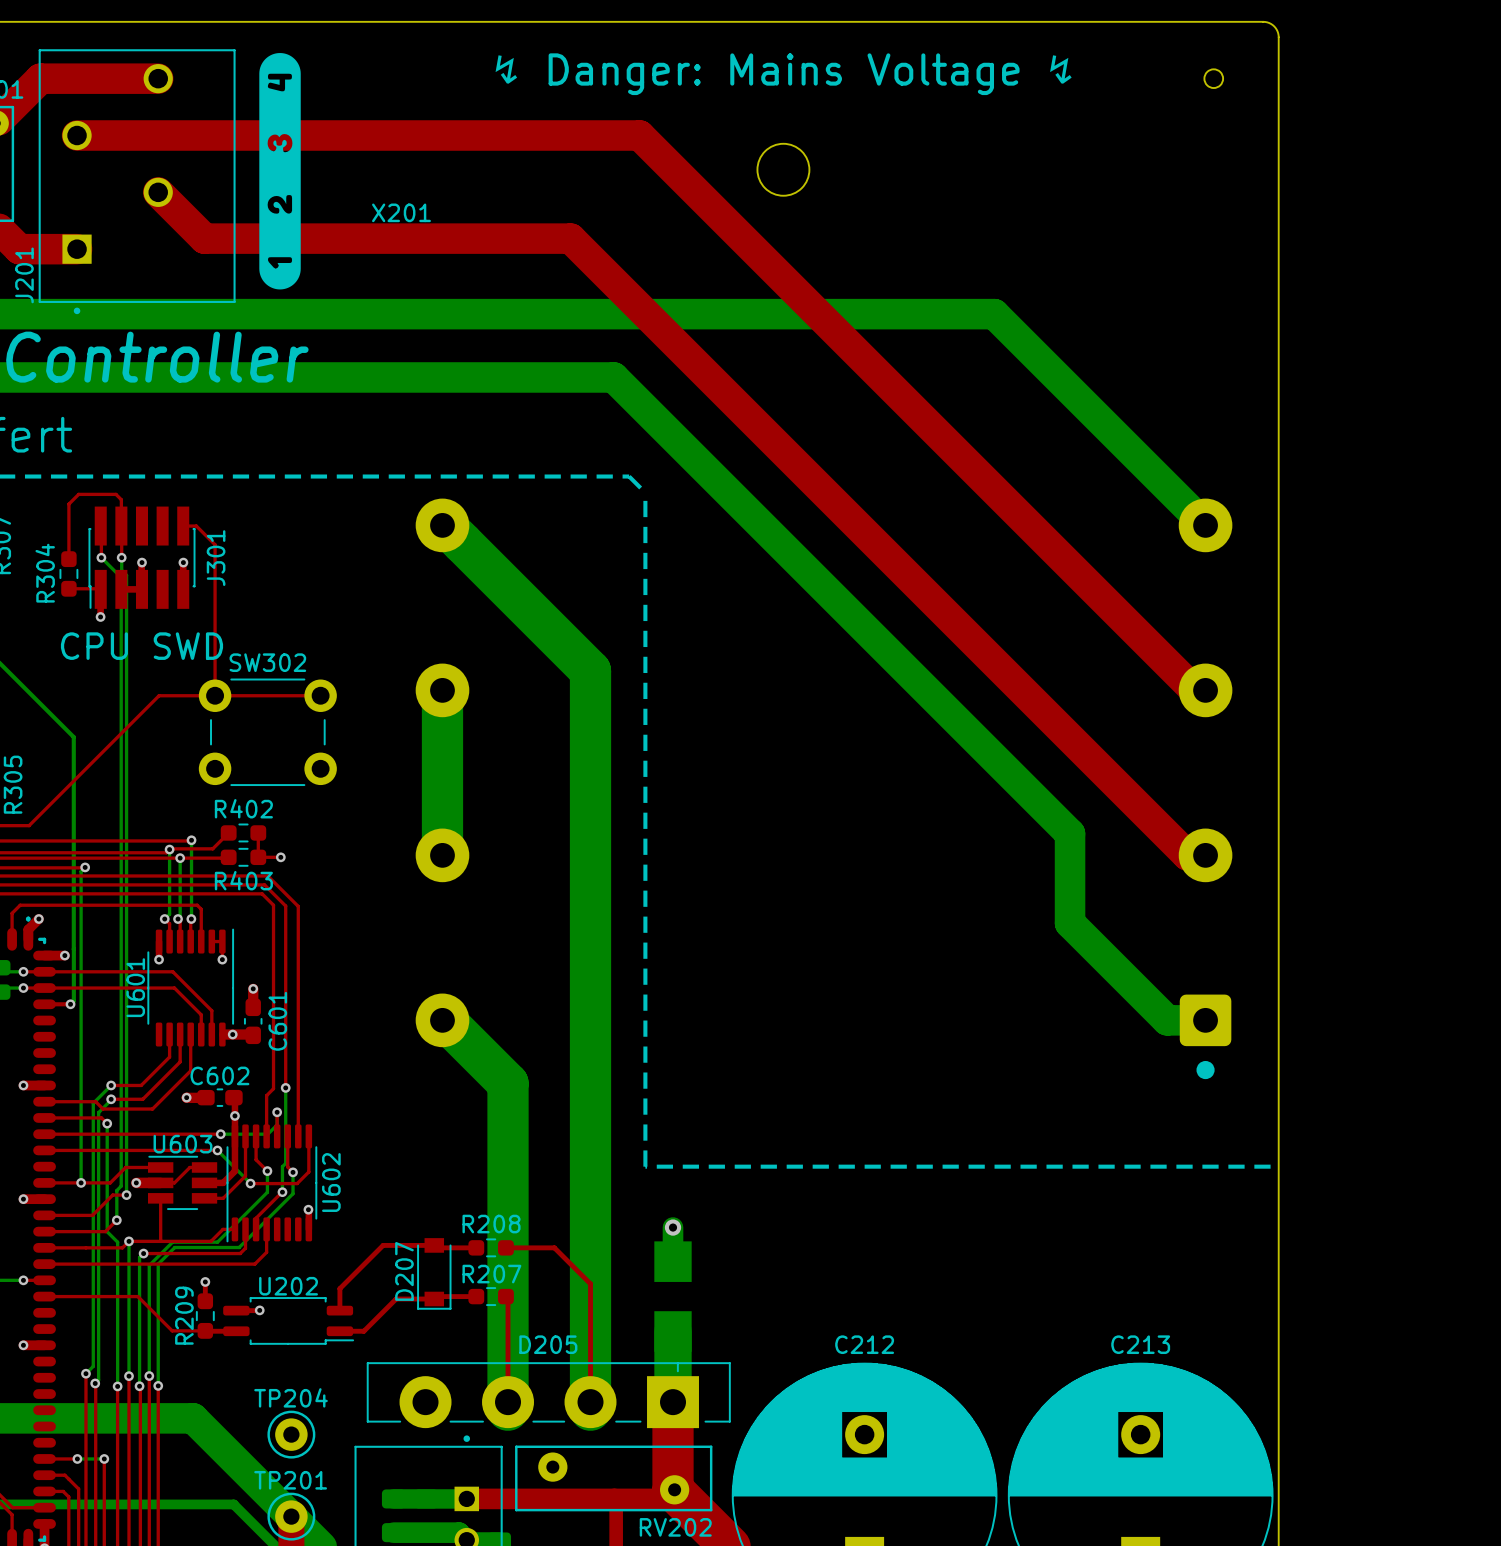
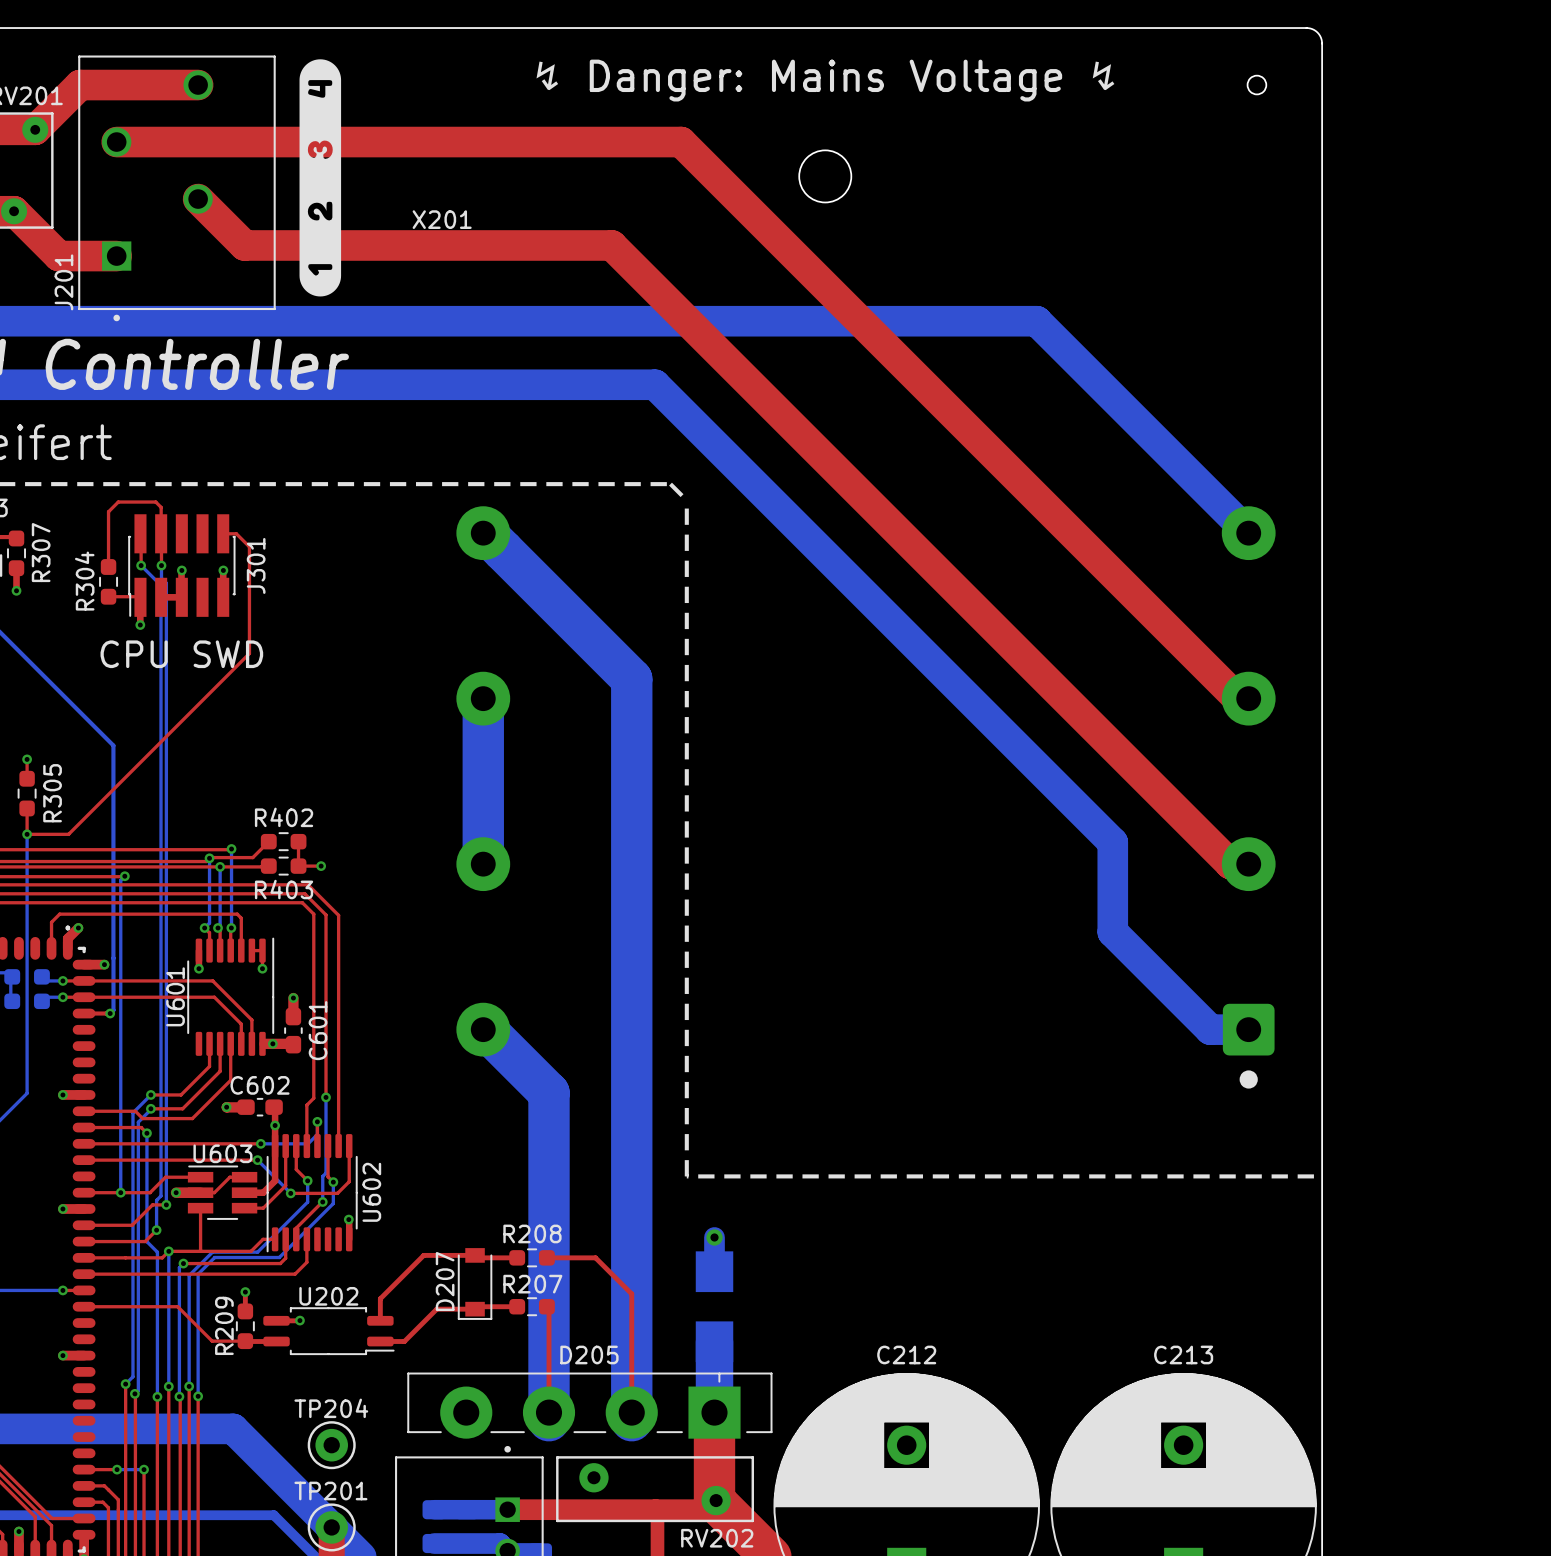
top track: (209, 539) (215, 544) (215, 695) -> (249, 546) (249, 653) (198, 704)
top track: (159, 695) (320, 695) -> none
SW302: (267, 732) -> none

